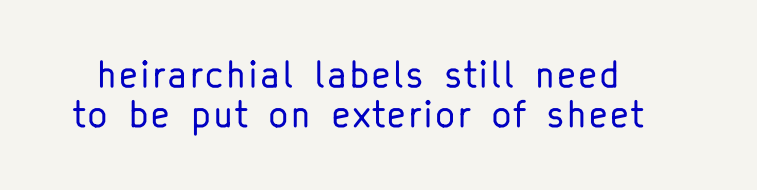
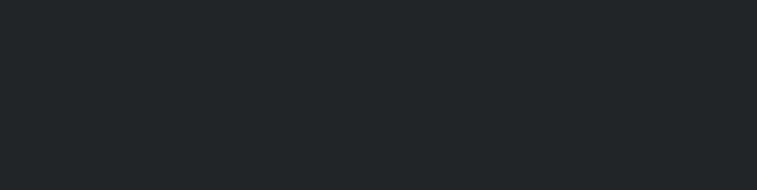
text: heirarchial labels still need (358, 73) -> none
text: to be put on exterior of sheet (358, 117) -> none

